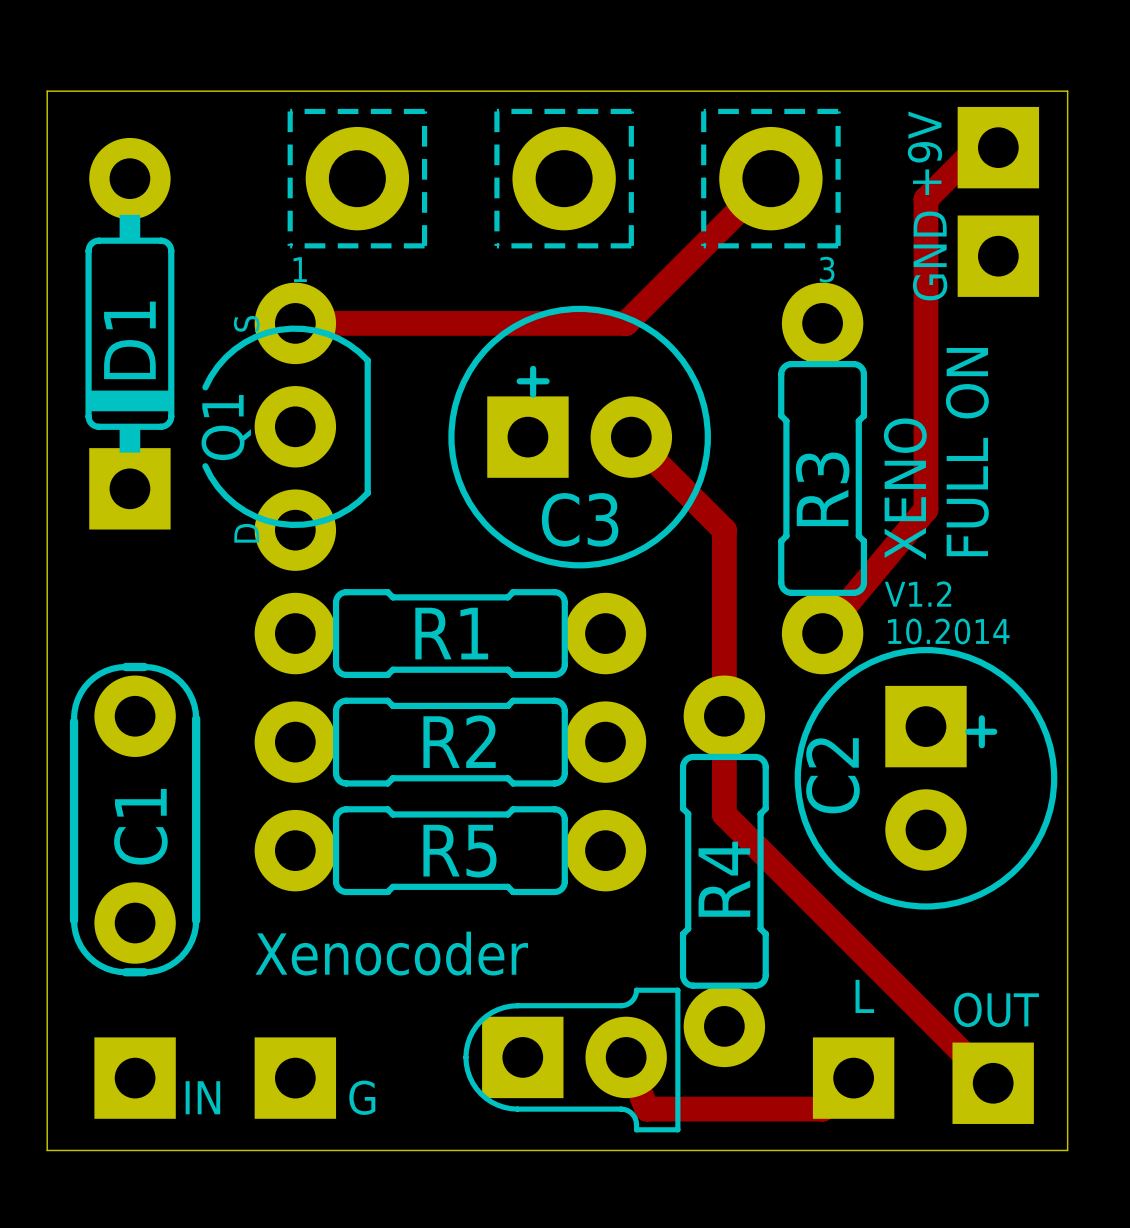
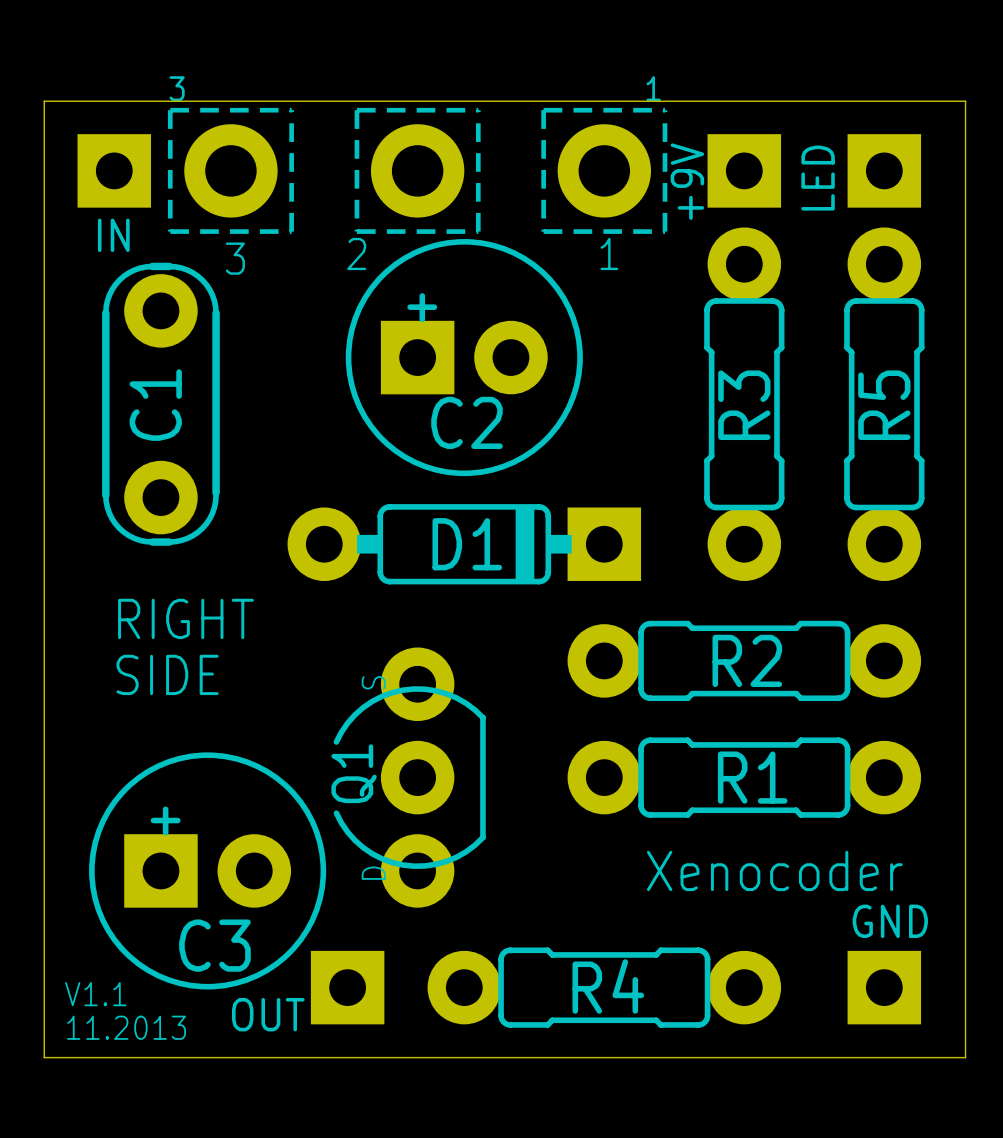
track: (998, 147) (977, 147) (925, 199) (925, 509) (822, 633) -> none
+9V position: (998, 147) -> (744, 170)
+9V name position: +9V (924, 153) -> +9V (687, 181)
part: none -> (417, 170)
LED: none -> (884, 170)
part: (564, 178) -> none
track: (770, 178) (626, 323) (295, 323) -> none
GND: (998, 256) -> none
text: none -> 2 (356, 253)
text: none -> 1 (609, 253)
text: none -> 3 (235, 258)
D1 rotation: 0° (129, 333) -> 90° counterclockwise (464, 544)
D1 position: (129, 333) -> (464, 544)
Q1 position: (286, 426) -> (409, 777)
C3 position: (579, 437) -> (207, 870)
track: (631, 437) (724, 530) (724, 814) (993, 1083) -> none
text: FULL ON (967, 452) -> none
R3 position: (822, 478) -> (744, 404)
R3 name position: R3 (822, 489) -> R3 (744, 405)
text: XENO (905, 489) -> none
text: V1.2 (918, 594) -> none
text: 10.2014 (948, 631) -> none
R1 position: (450, 633) -> (744, 777)
text: none -> RIGHT (185, 618)
text: none -> SIDE (167, 674)
R2 position: (450, 742) -> (744, 660)
C2 rotation: 0° (925, 778) -> 90° counterclockwise (464, 357)
C2 position: (925, 778) -> (464, 357)
C1 rotation: 0° (135, 819) -> 180° (160, 404)
C1 position: (135, 819) -> (160, 404)
R5 rotation: 0° (450, 850) -> 90° clockwise (884, 404)
R5 position: (450, 850) -> (884, 404)
R4 rotation: 0° (724, 871) -> 90° clockwise (604, 987)
text position: Xenocoder (391, 953) -> Xenocoder (774, 870)
OUT name: OUT (996, 1009) -> GND (890, 921)
track: (626, 1057) (646, 1109) (822, 1109) (853, 1078) -> none
part: (571, 1060) -> none
OUT: none -> (347, 987)
IN position: (135, 1078) -> (114, 170)
G: (295, 1078) -> none
L: (853, 1078) -> none
text: none -> V1.1 (95, 994)
OUT position: (993, 1083) -> (884, 987)
IN name position: IN (202, 1097) -> IN (113, 235)
text: none -> 11.2013 (126, 1027)

